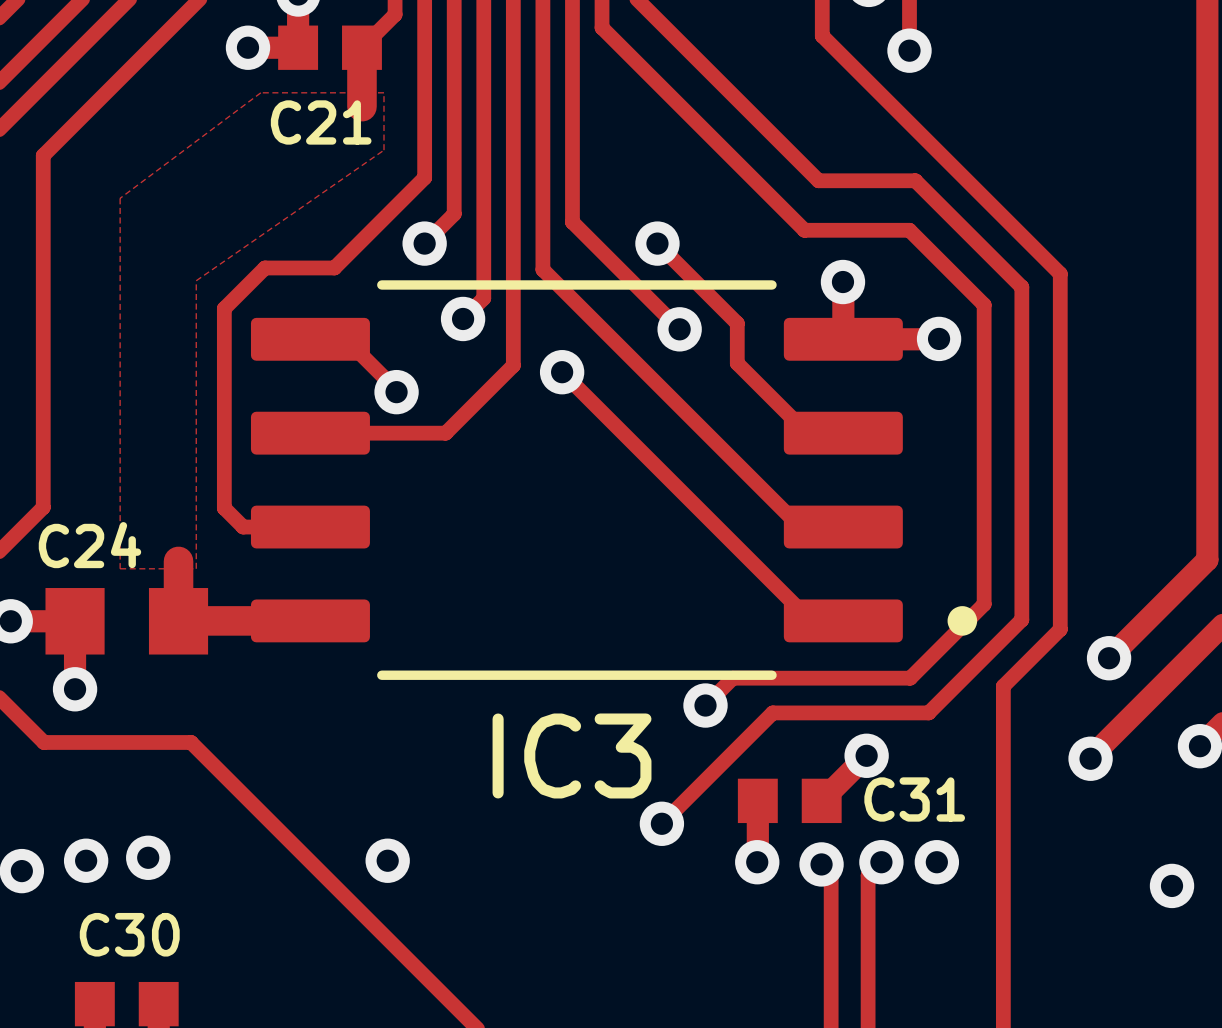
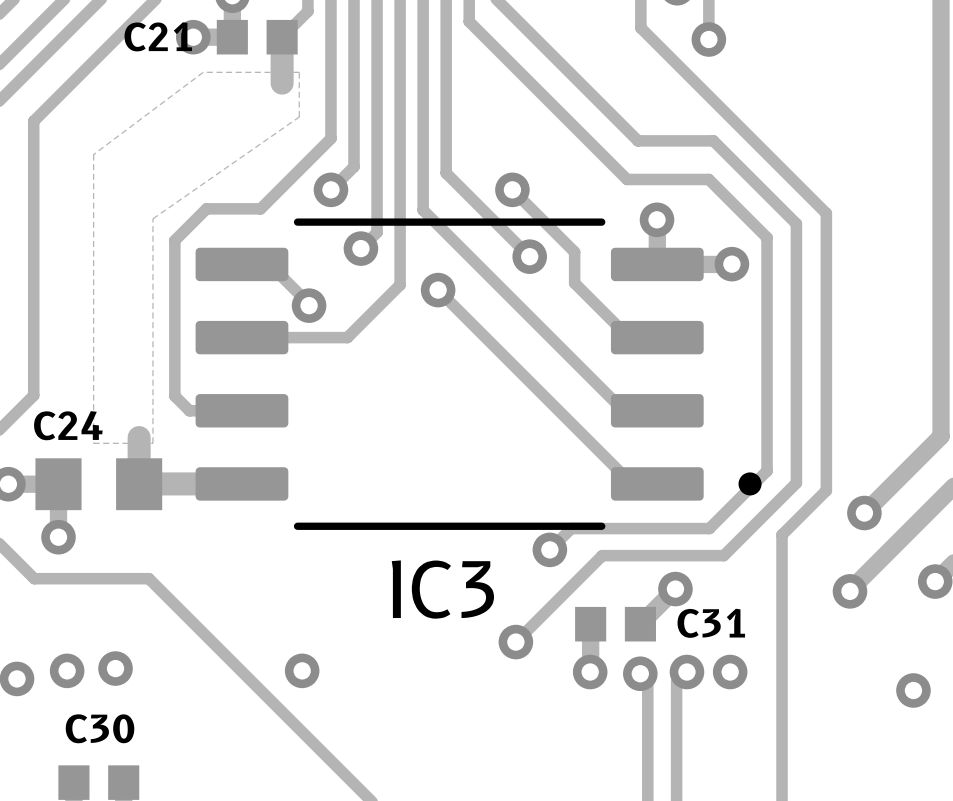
C21 name position: C21 (321, 122) -> C21 (158, 36)

